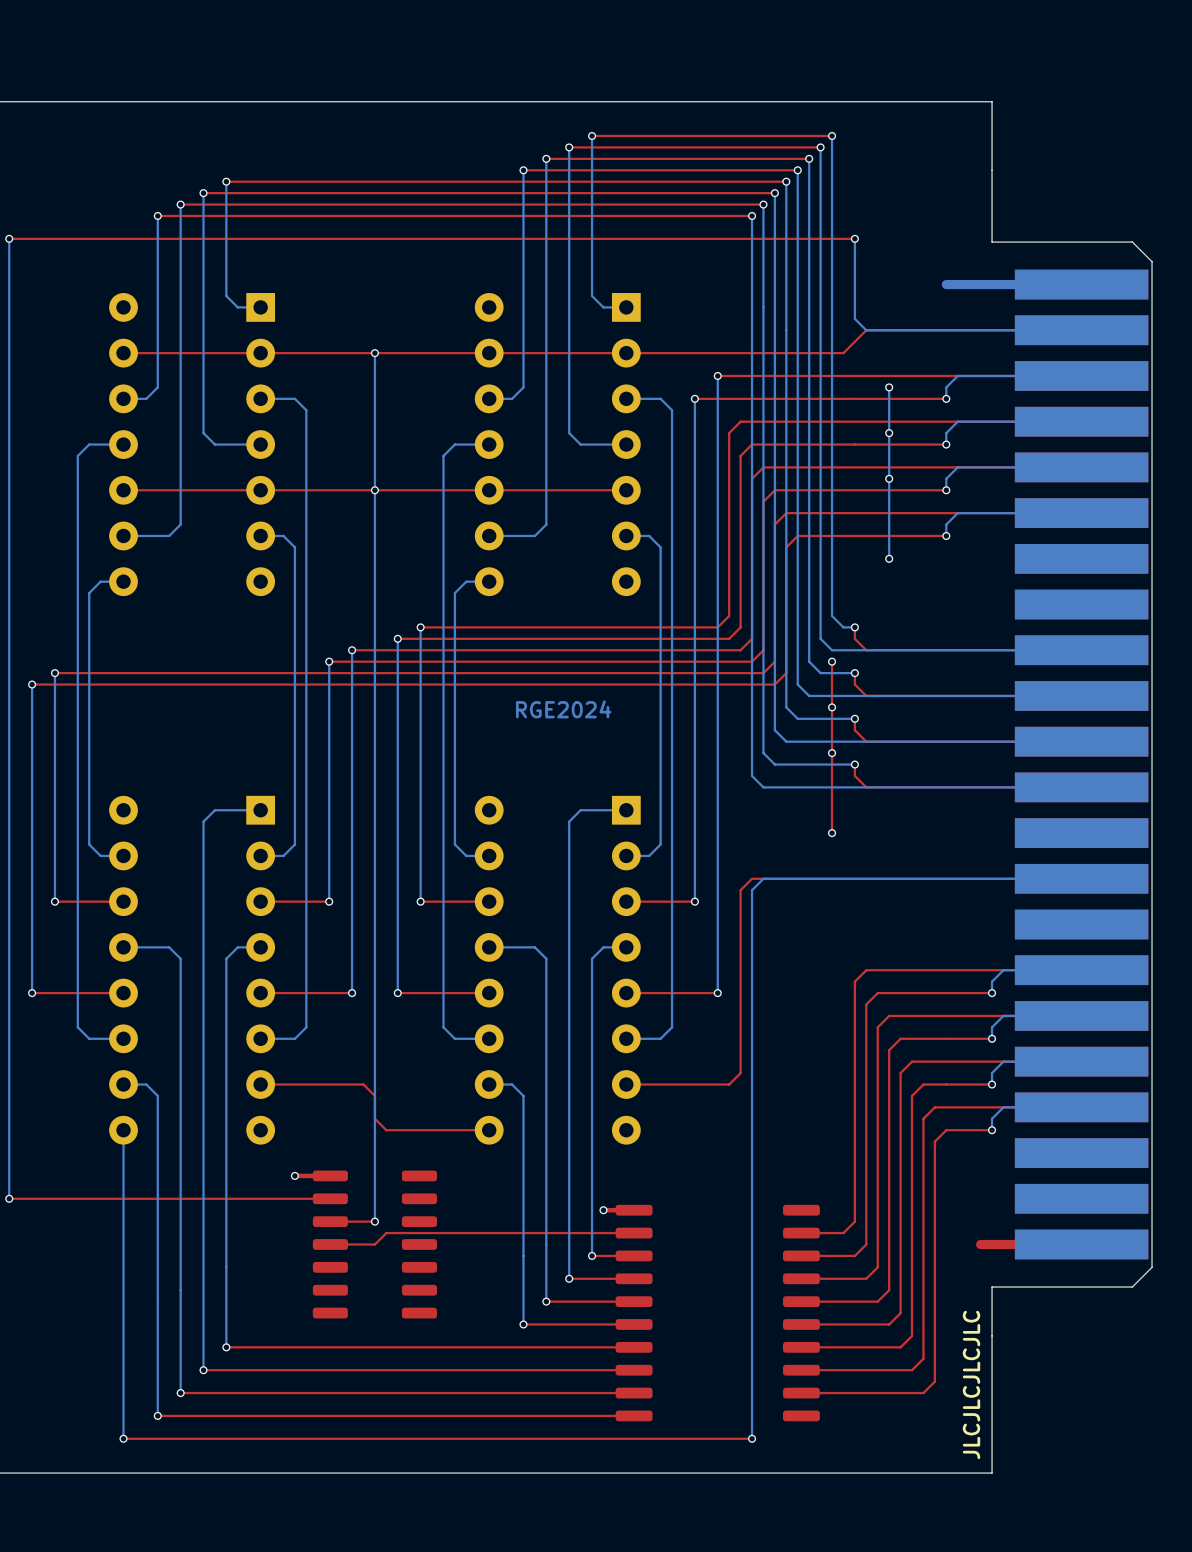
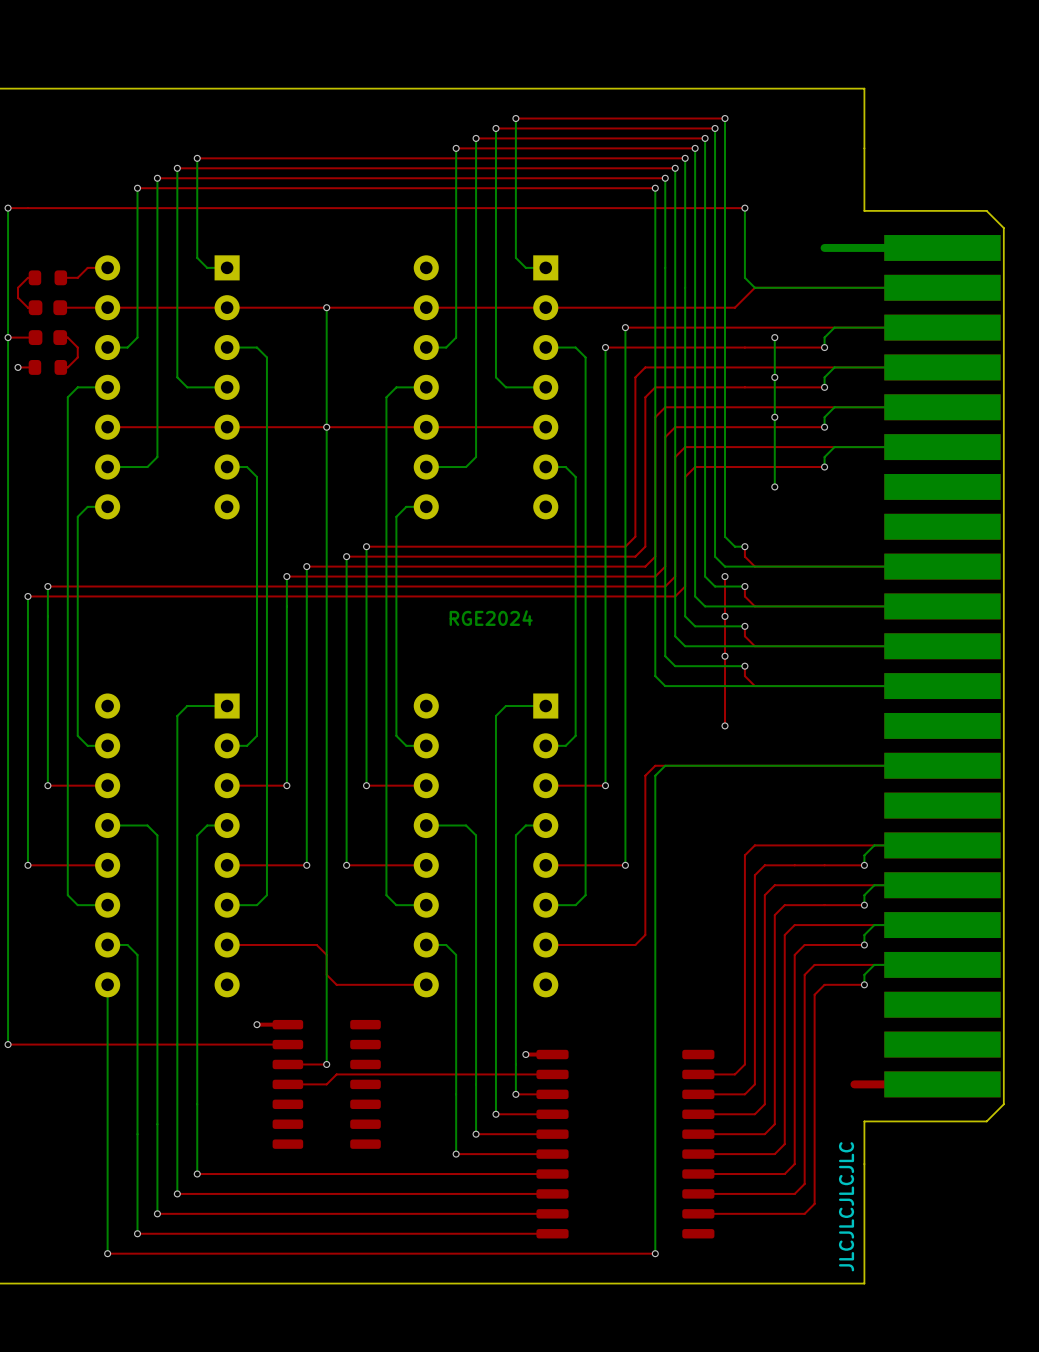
top track: none -> (107, 267) (87, 267) (77, 277) (60, 277)
top track: none -> (34, 277) (27, 277) (18, 287) (18, 297) (27, 307) (35, 307)
part: none -> (47, 277)
part: none -> (47, 307)
top track: none -> (107, 307) (60, 307)
via: none -> (8, 337)
top track: none -> (35, 337) (8, 337)
part: none -> (47, 337)
top track: none -> (60, 337) (67, 337) (77, 347) (77, 357) (67, 367) (60, 367)
via: none -> (18, 367)
top track: none -> (34, 367) (18, 367)
part: none -> (47, 367)

